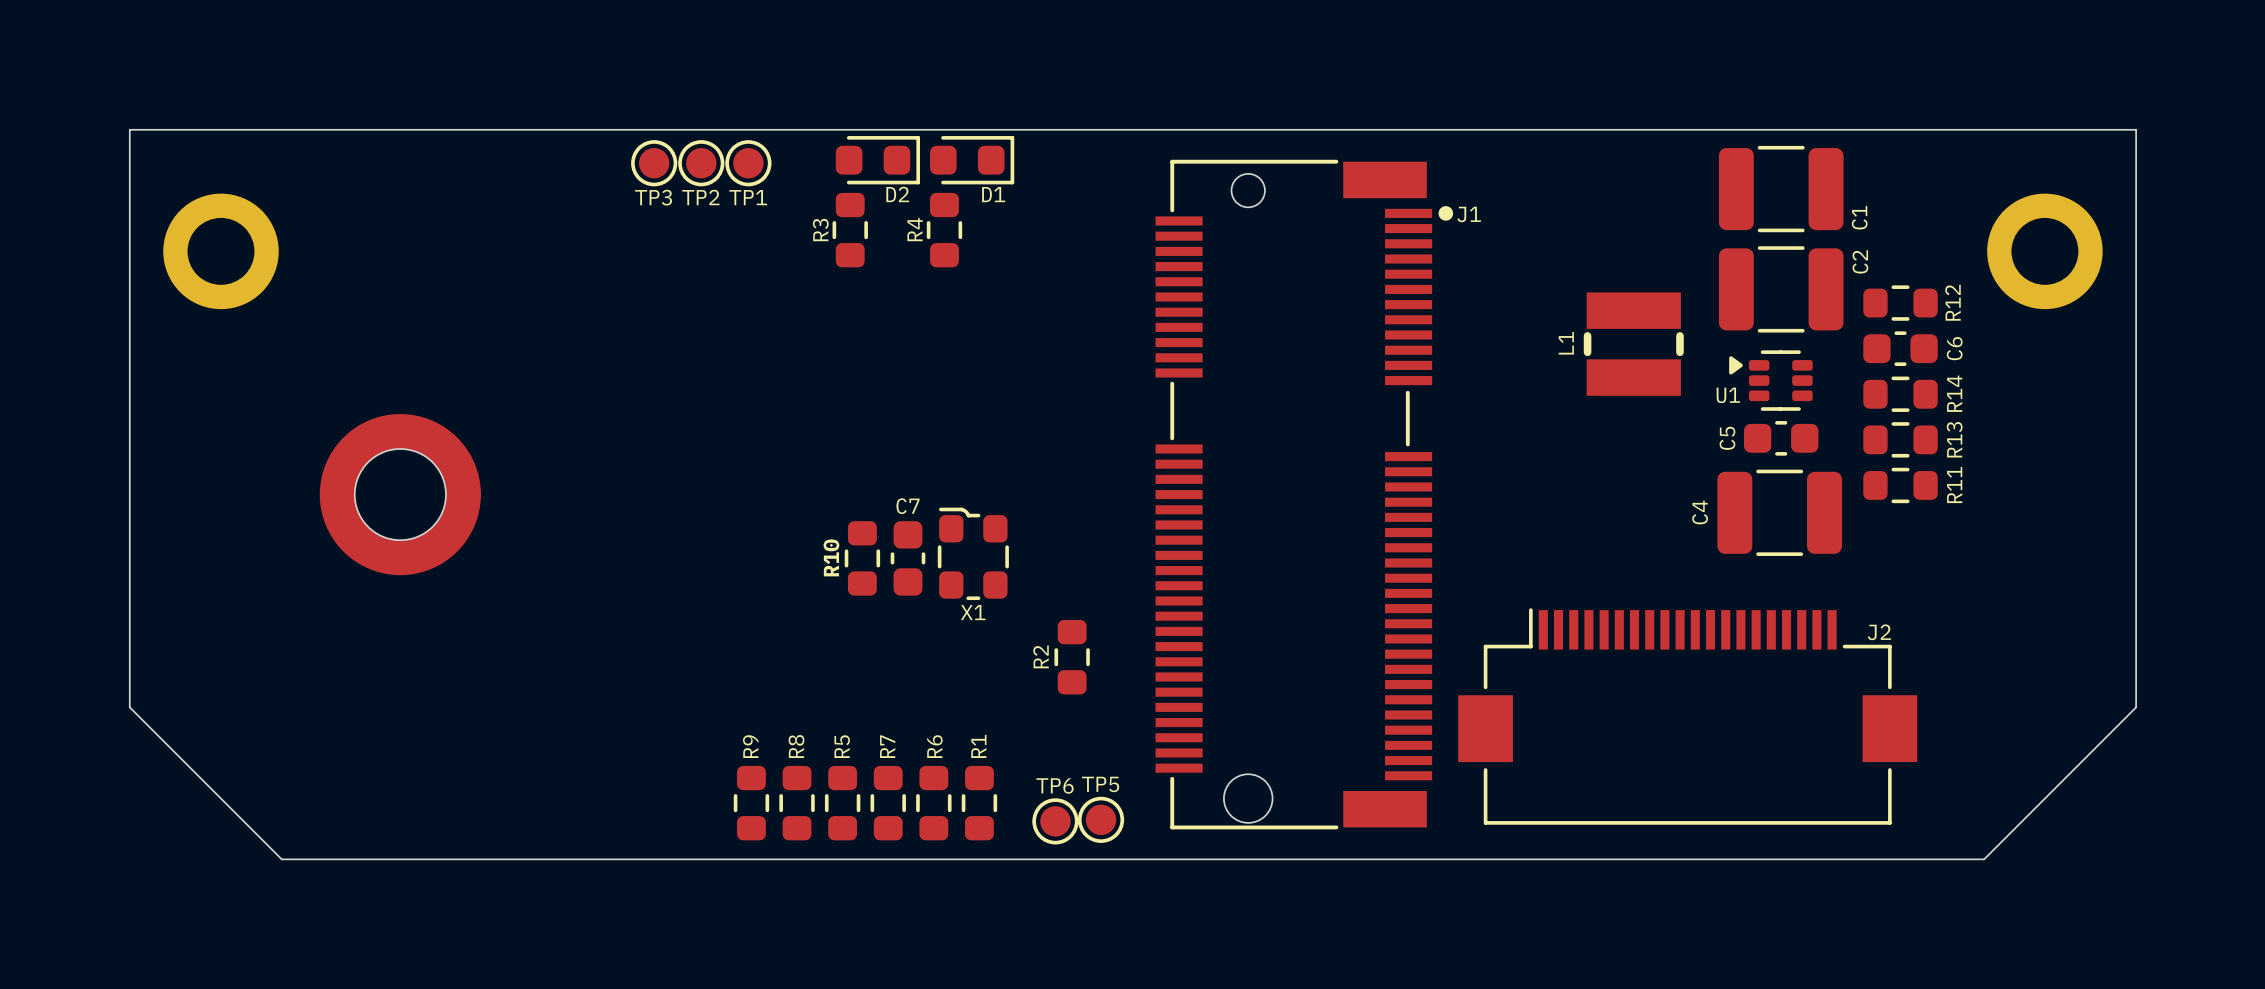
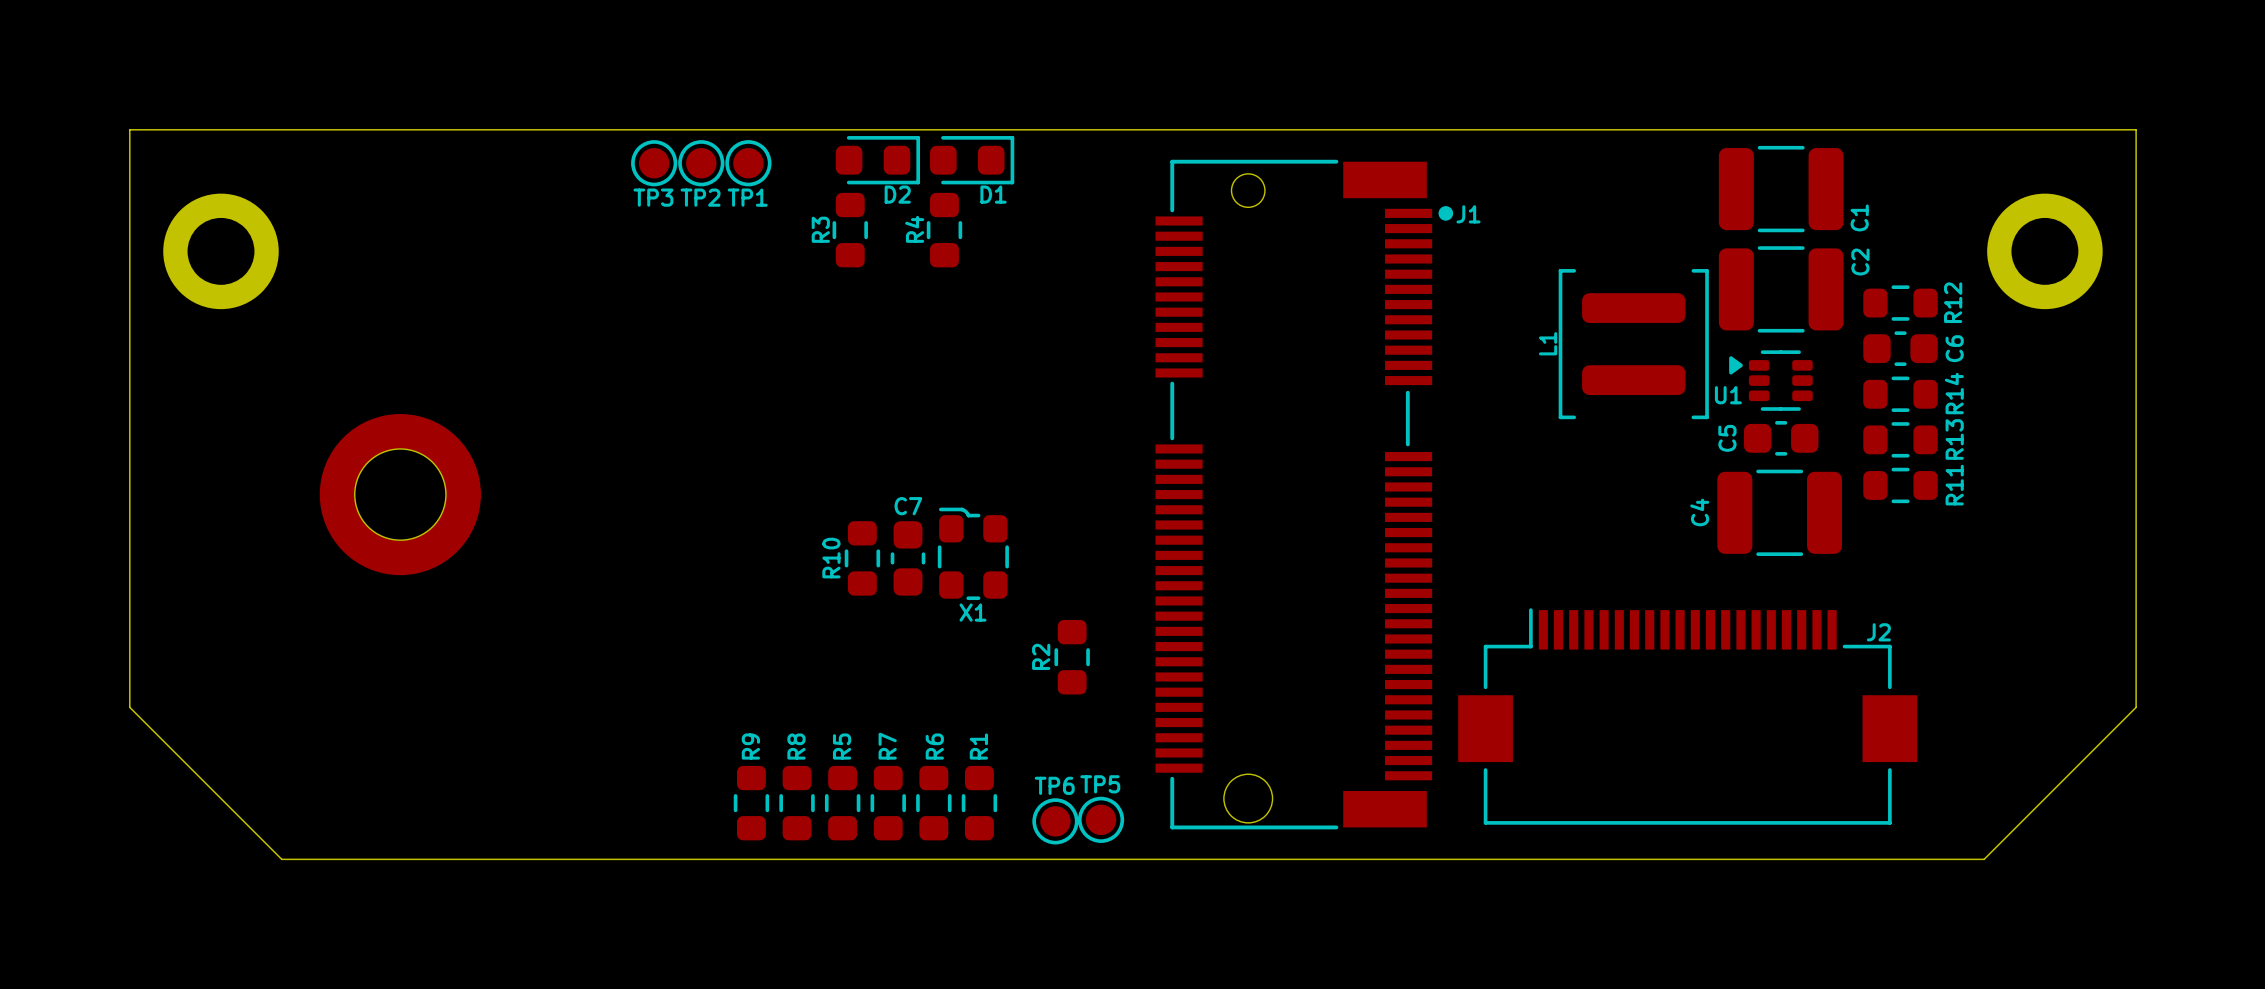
L1 footprint: [1583, 292, 1684, 396] -> [1558, 269, 1709, 420]

